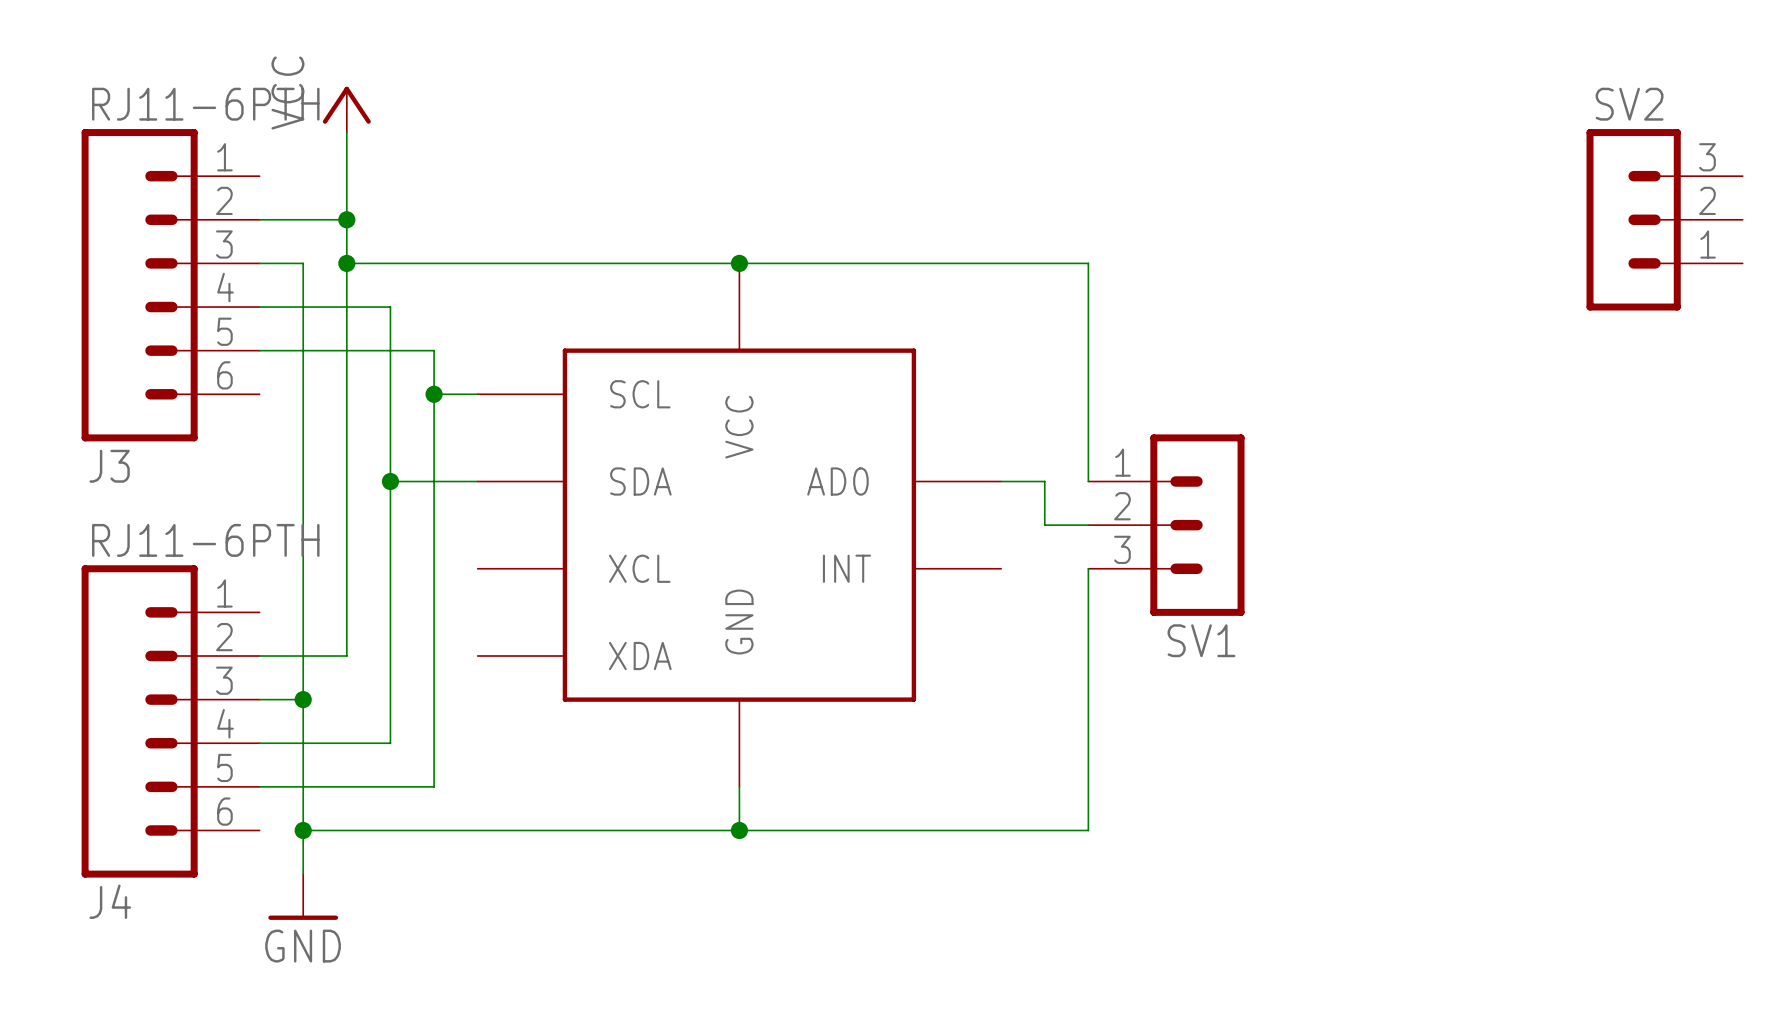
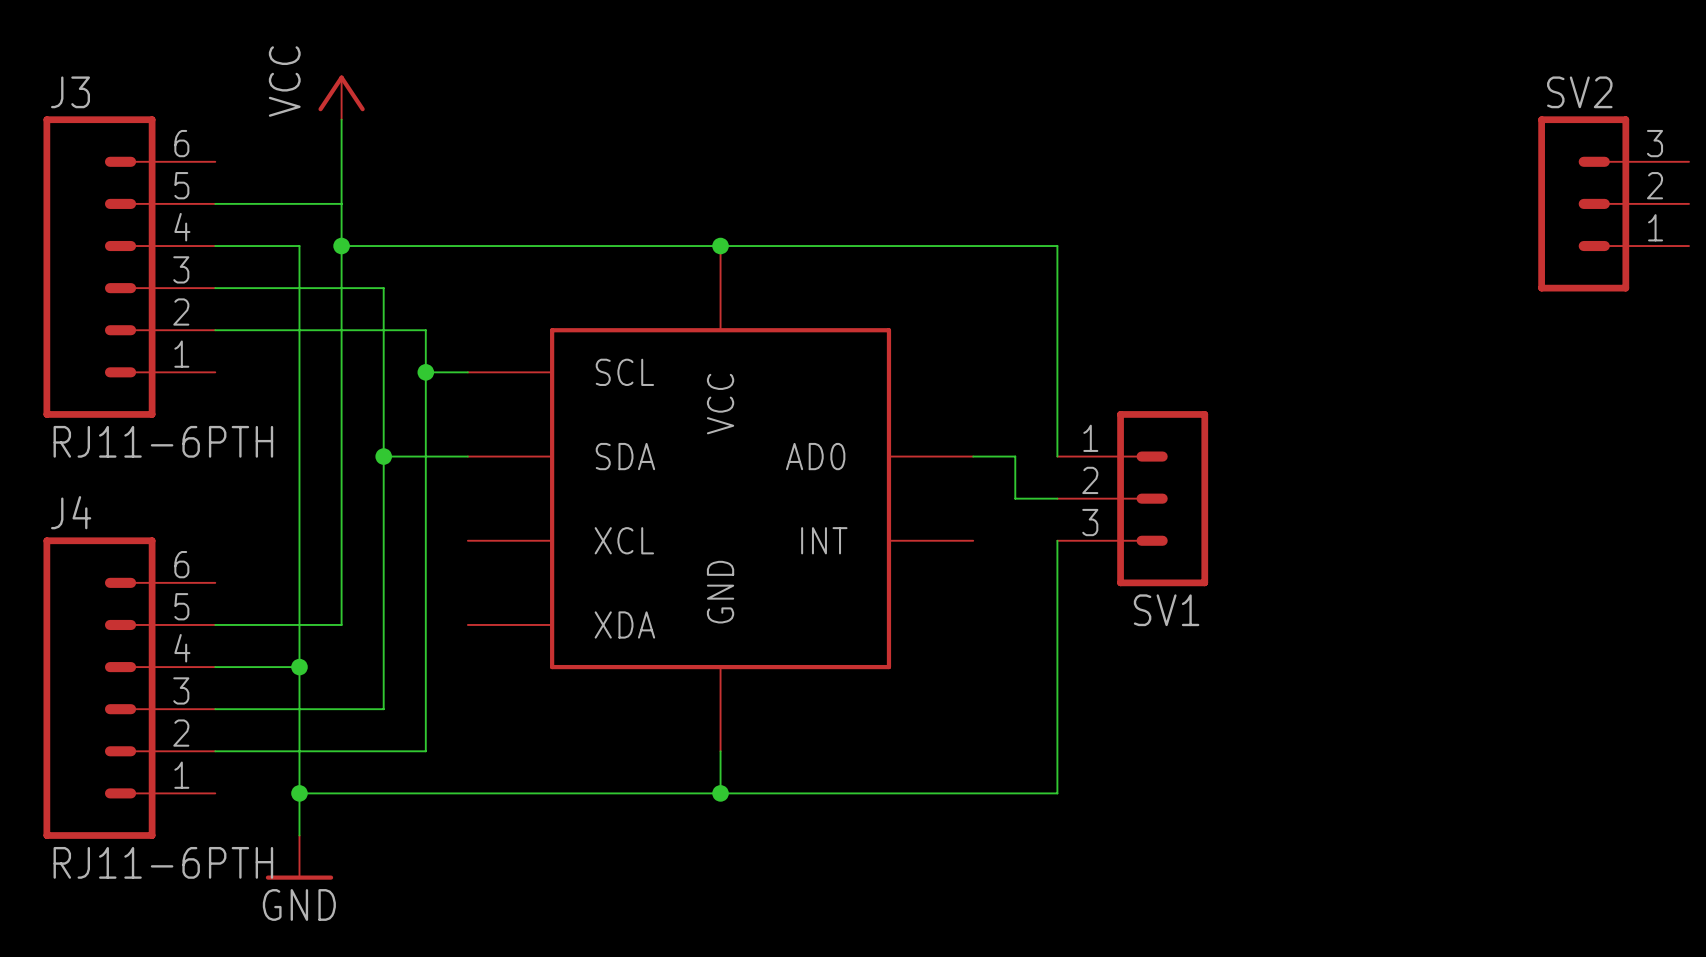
junction: (346, 219) -> none
J3 flip: as is (139, 285) -> up-down (99, 267)
J4 flip: as is (139, 721) -> up-down (99, 688)

